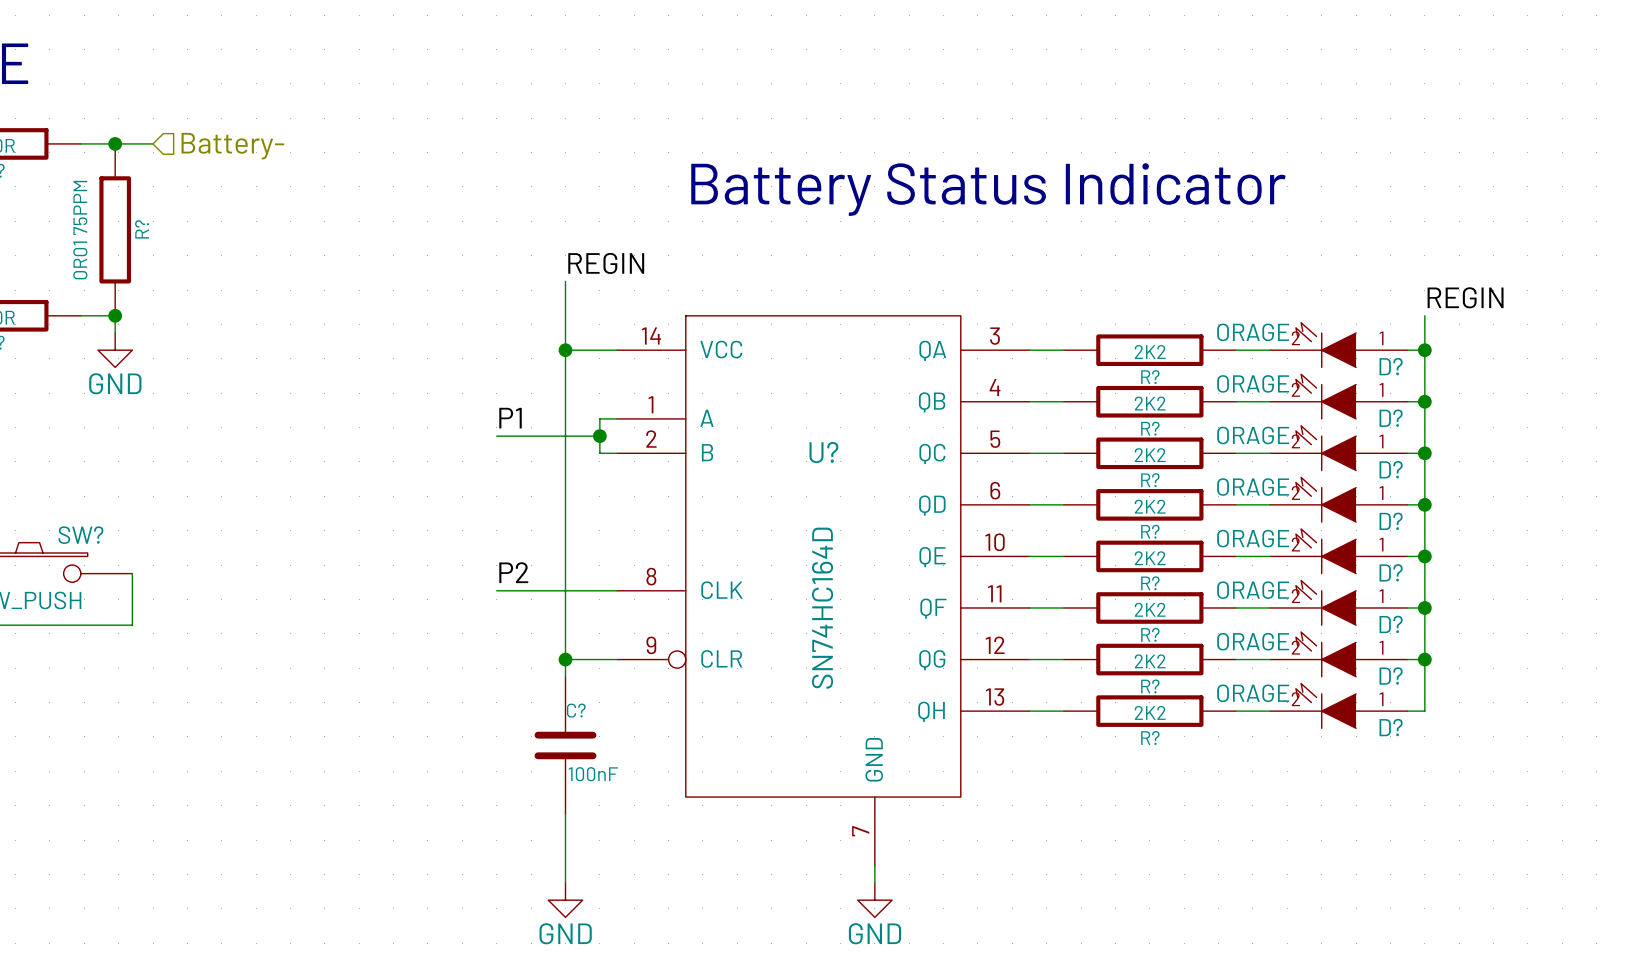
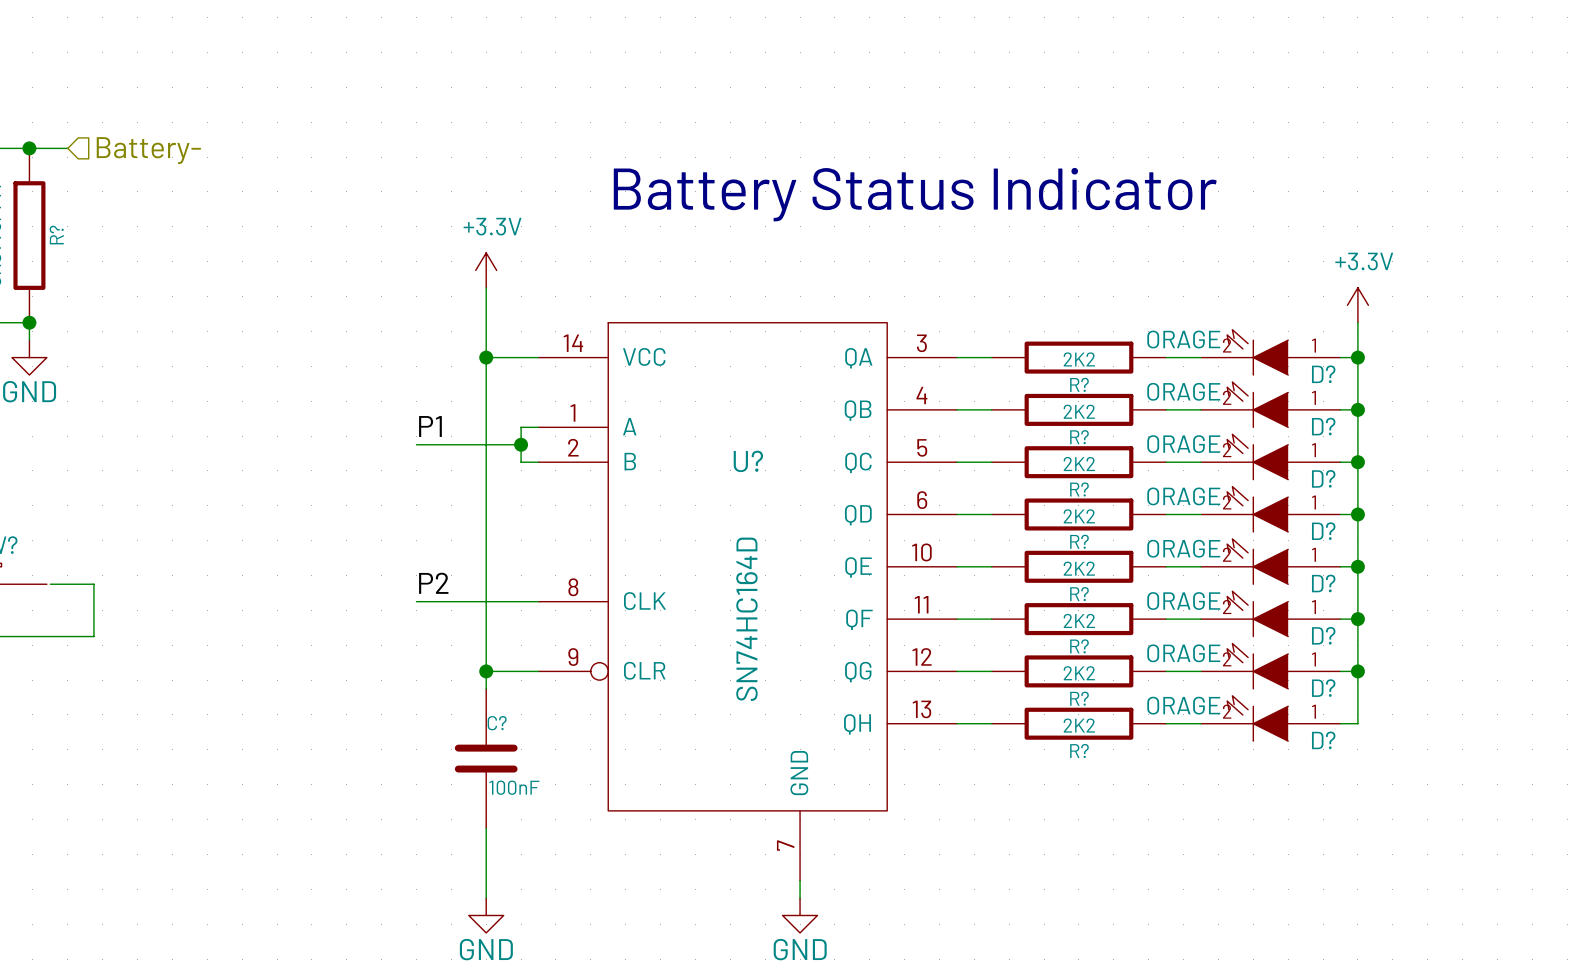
label: REGIN (606, 263) -> none
power symbol: none -> +3.3V (486, 270)
label: REGIN (1465, 297) -> none
power symbol: none -> +3.3V (1357, 305)
wire: (132, 573) (132, 625) -> (50, 584) (93, 584) (93, 636) (46, 636)

